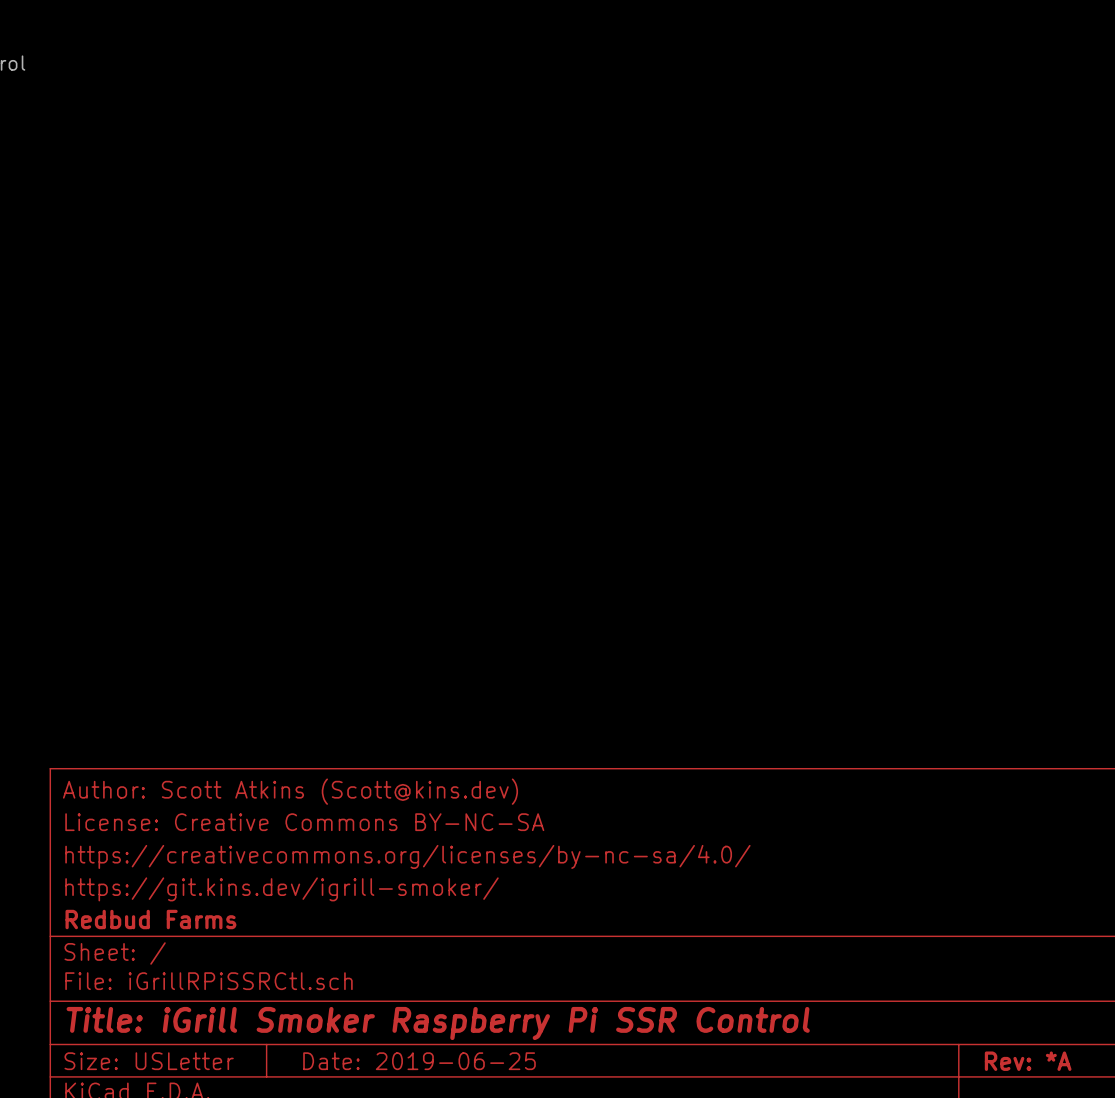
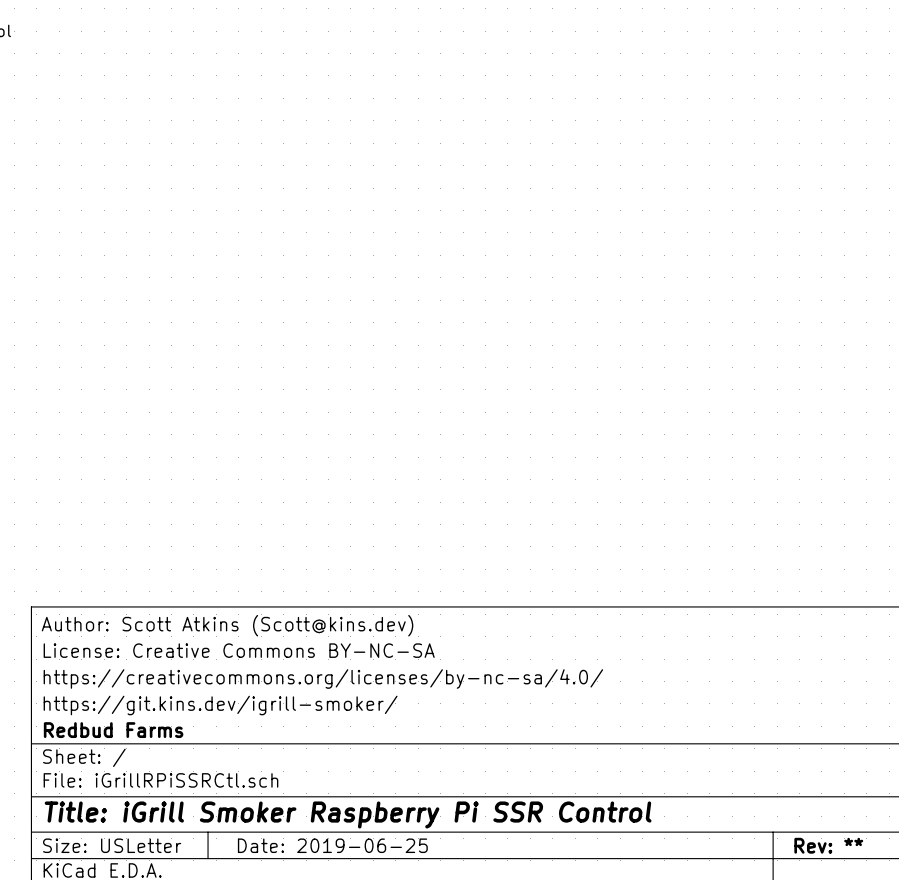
title block: Rev: *A (1028, 1061) -> Rev: ** (828, 845)

